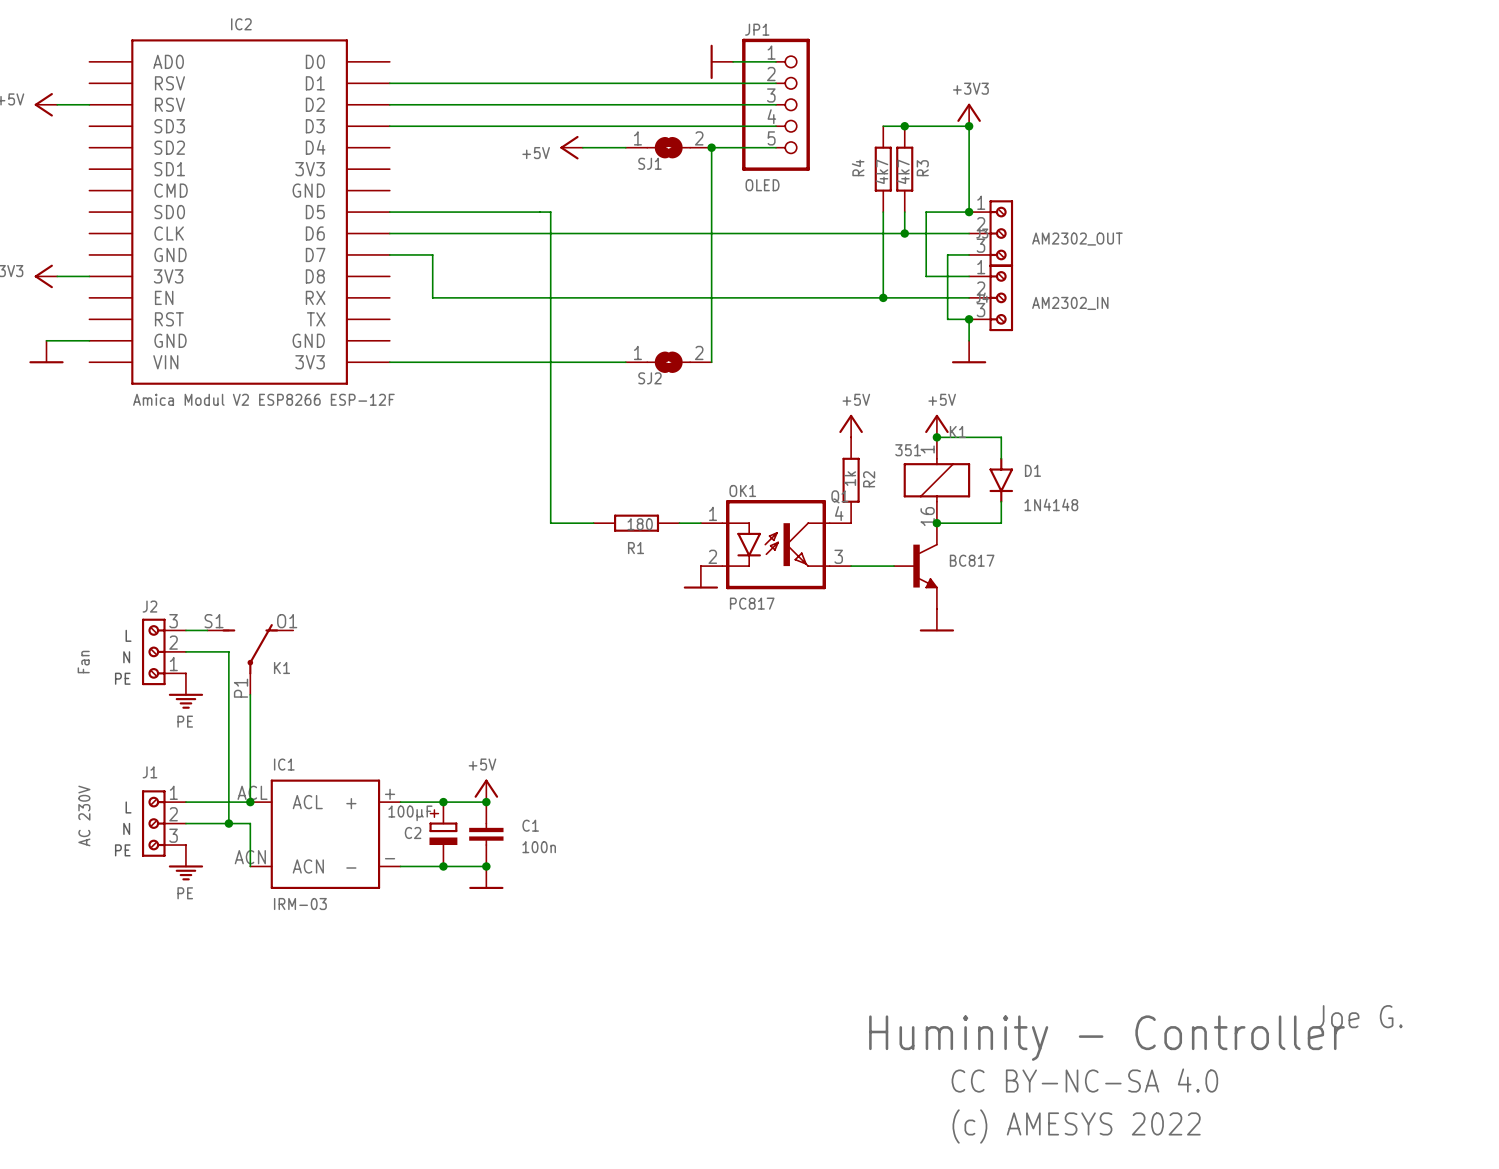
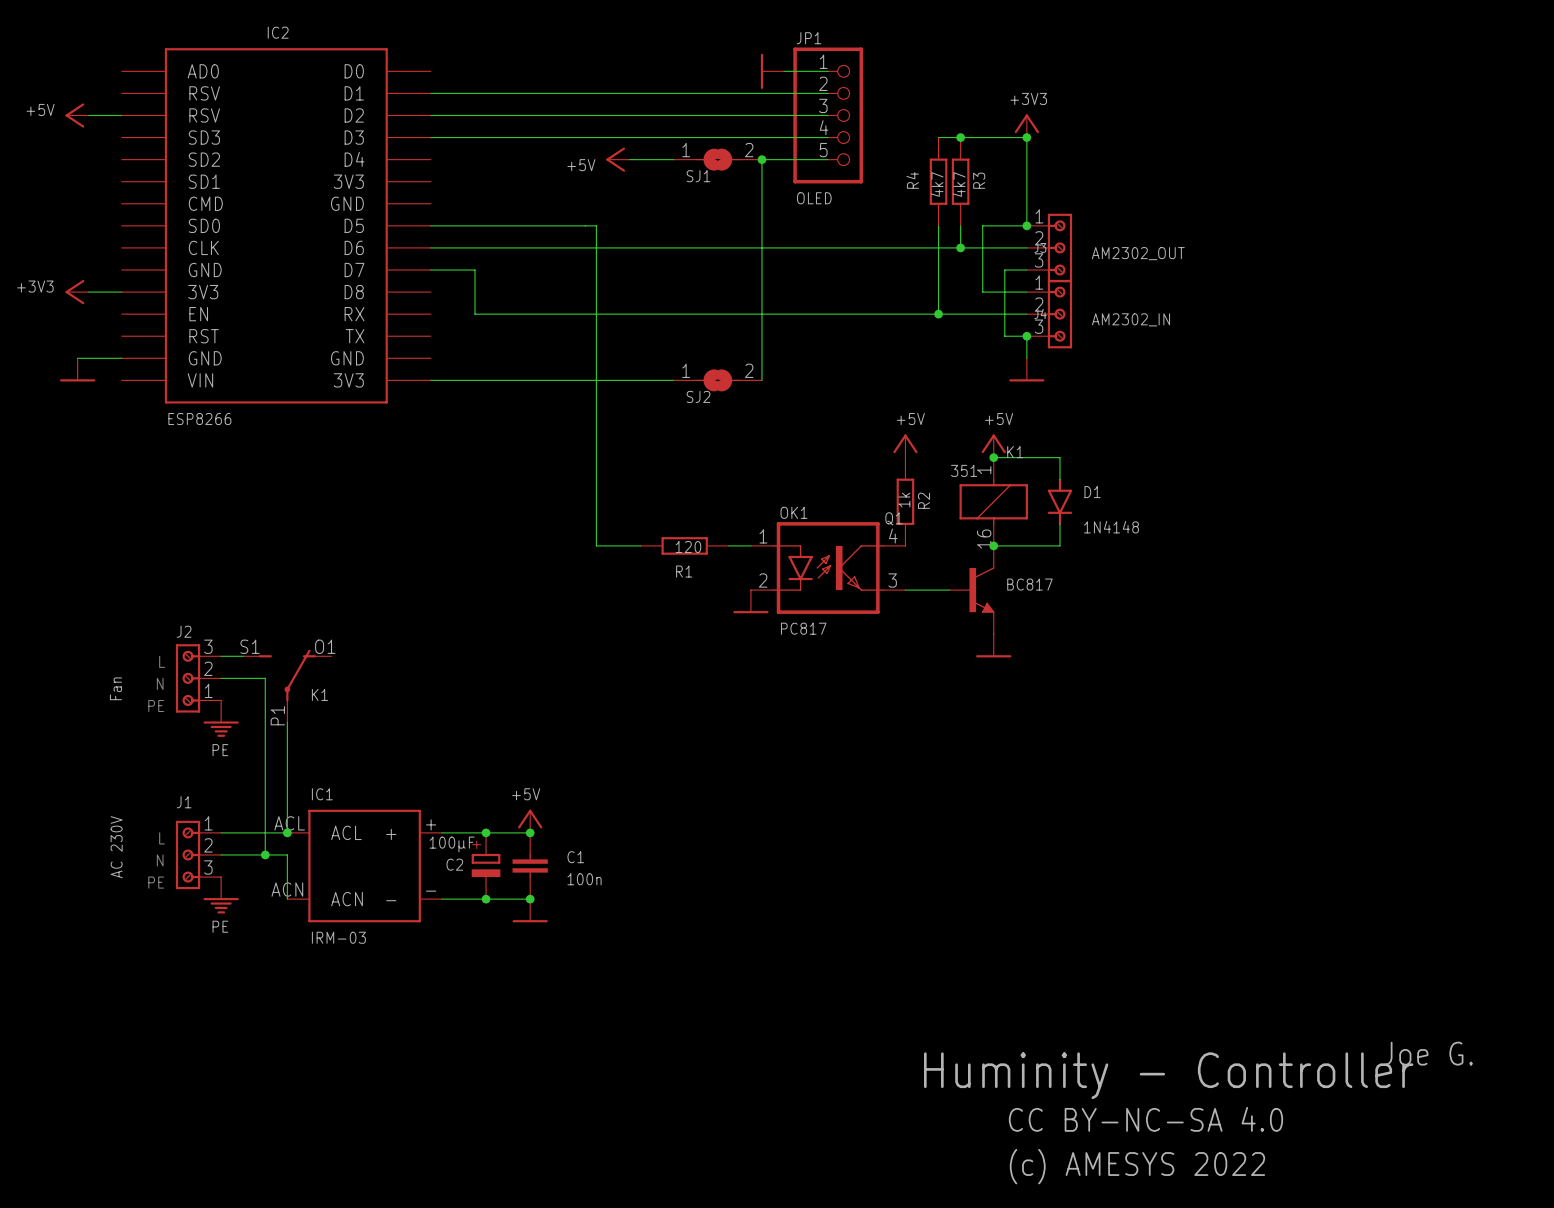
IC2 value: Amica Modul V2 ESP8266 ESP-12F (263, 399) -> ESP8266 (199, 419)
R1 value: 180 (640, 524) -> 120 (688, 547)

